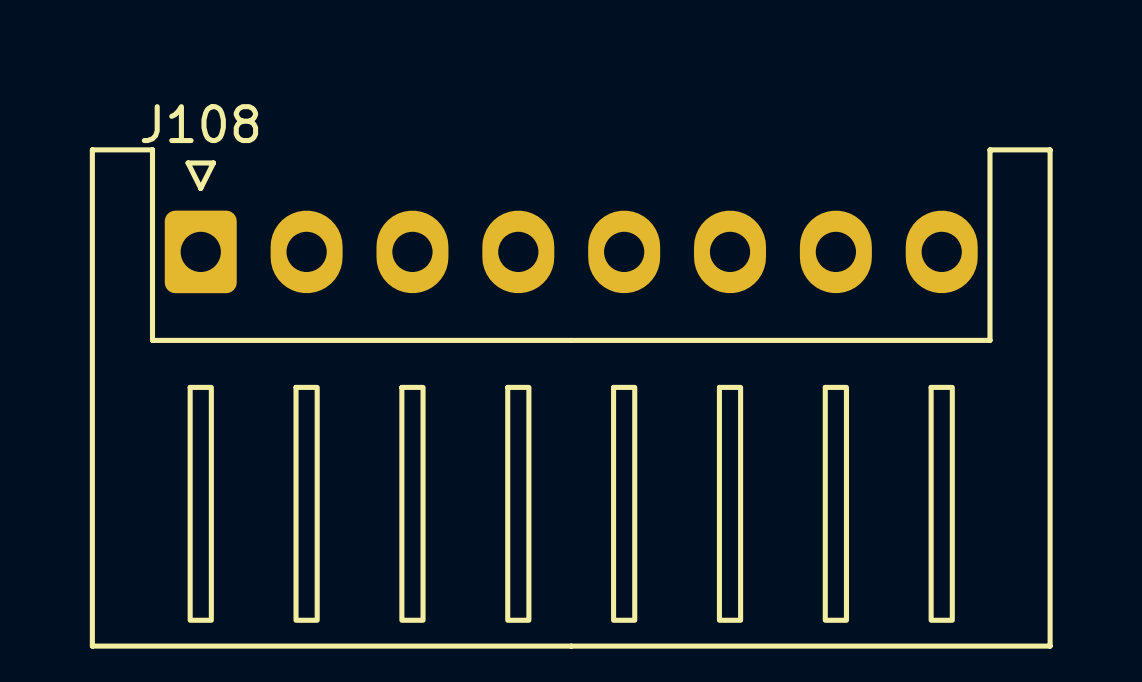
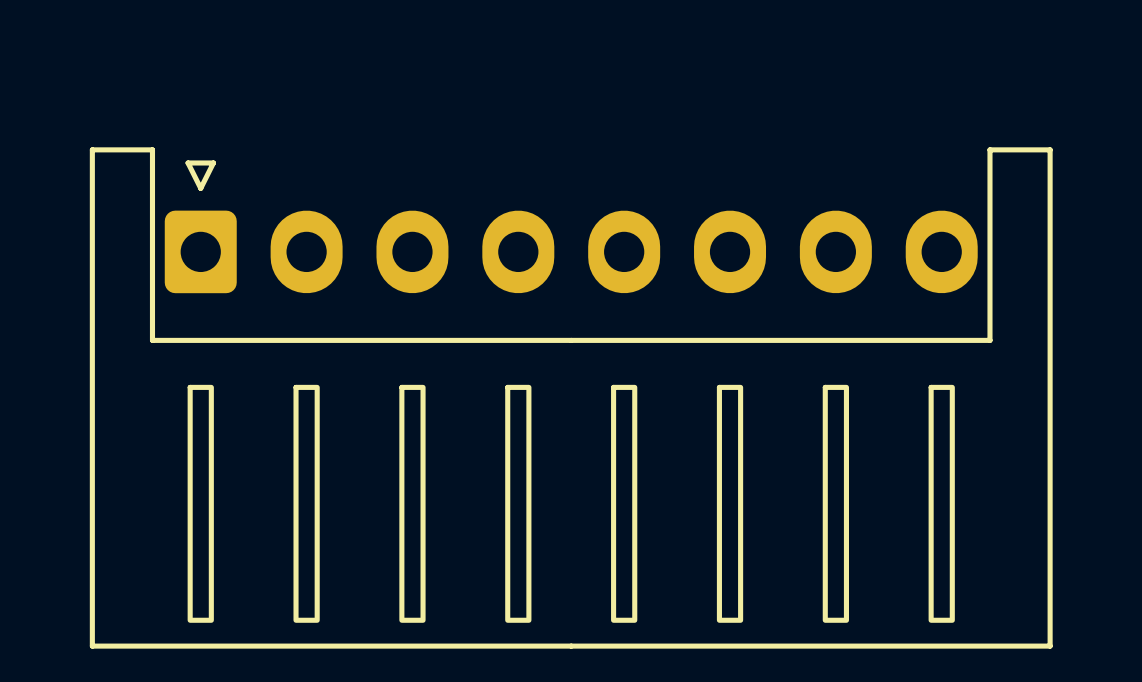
J108 name: J108 (199, 123) -> none

